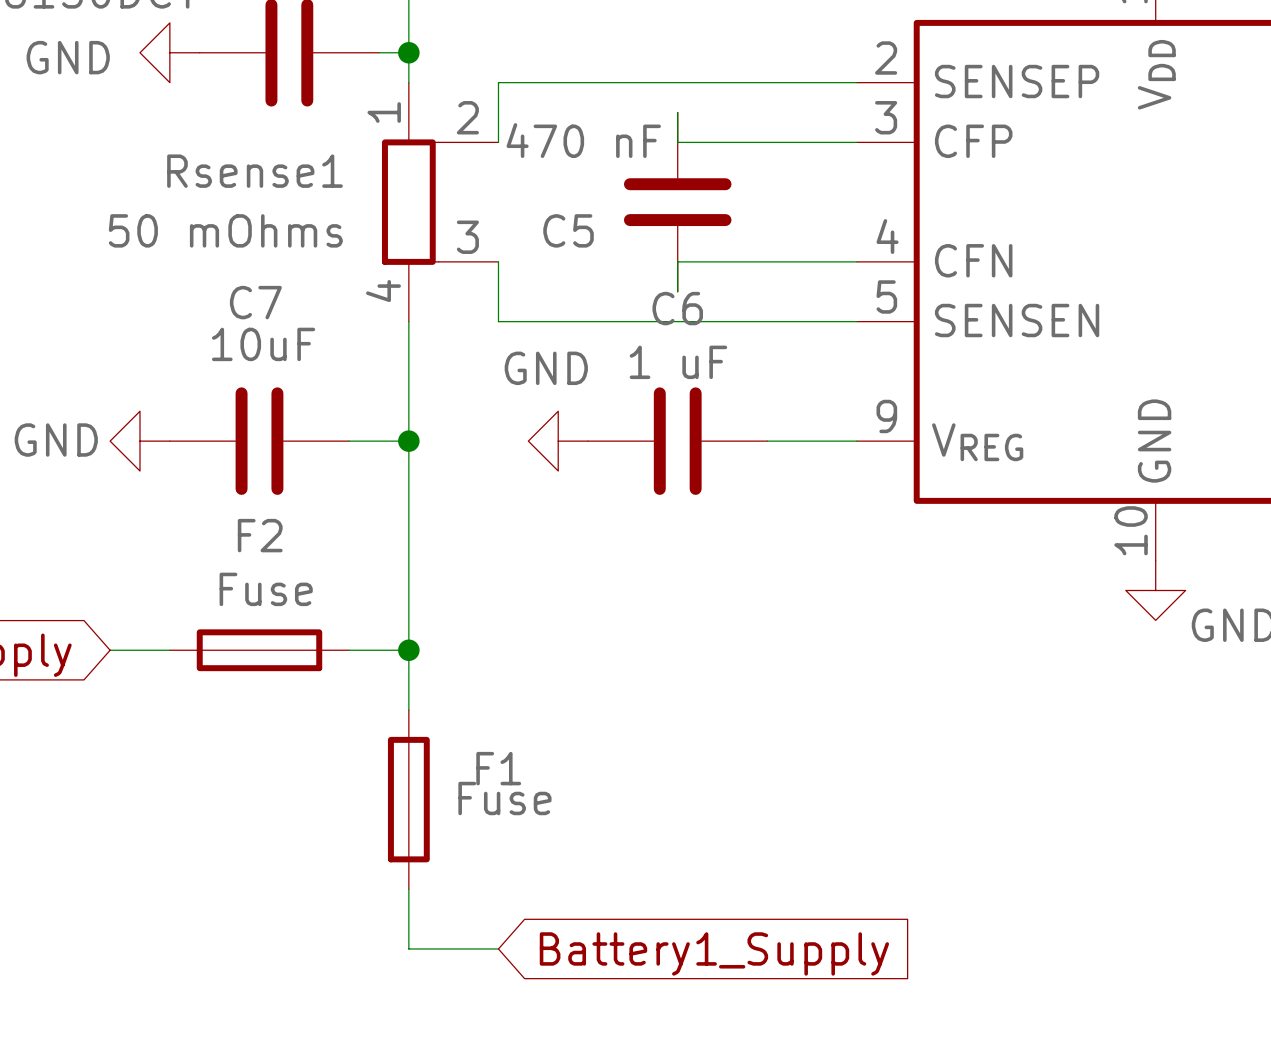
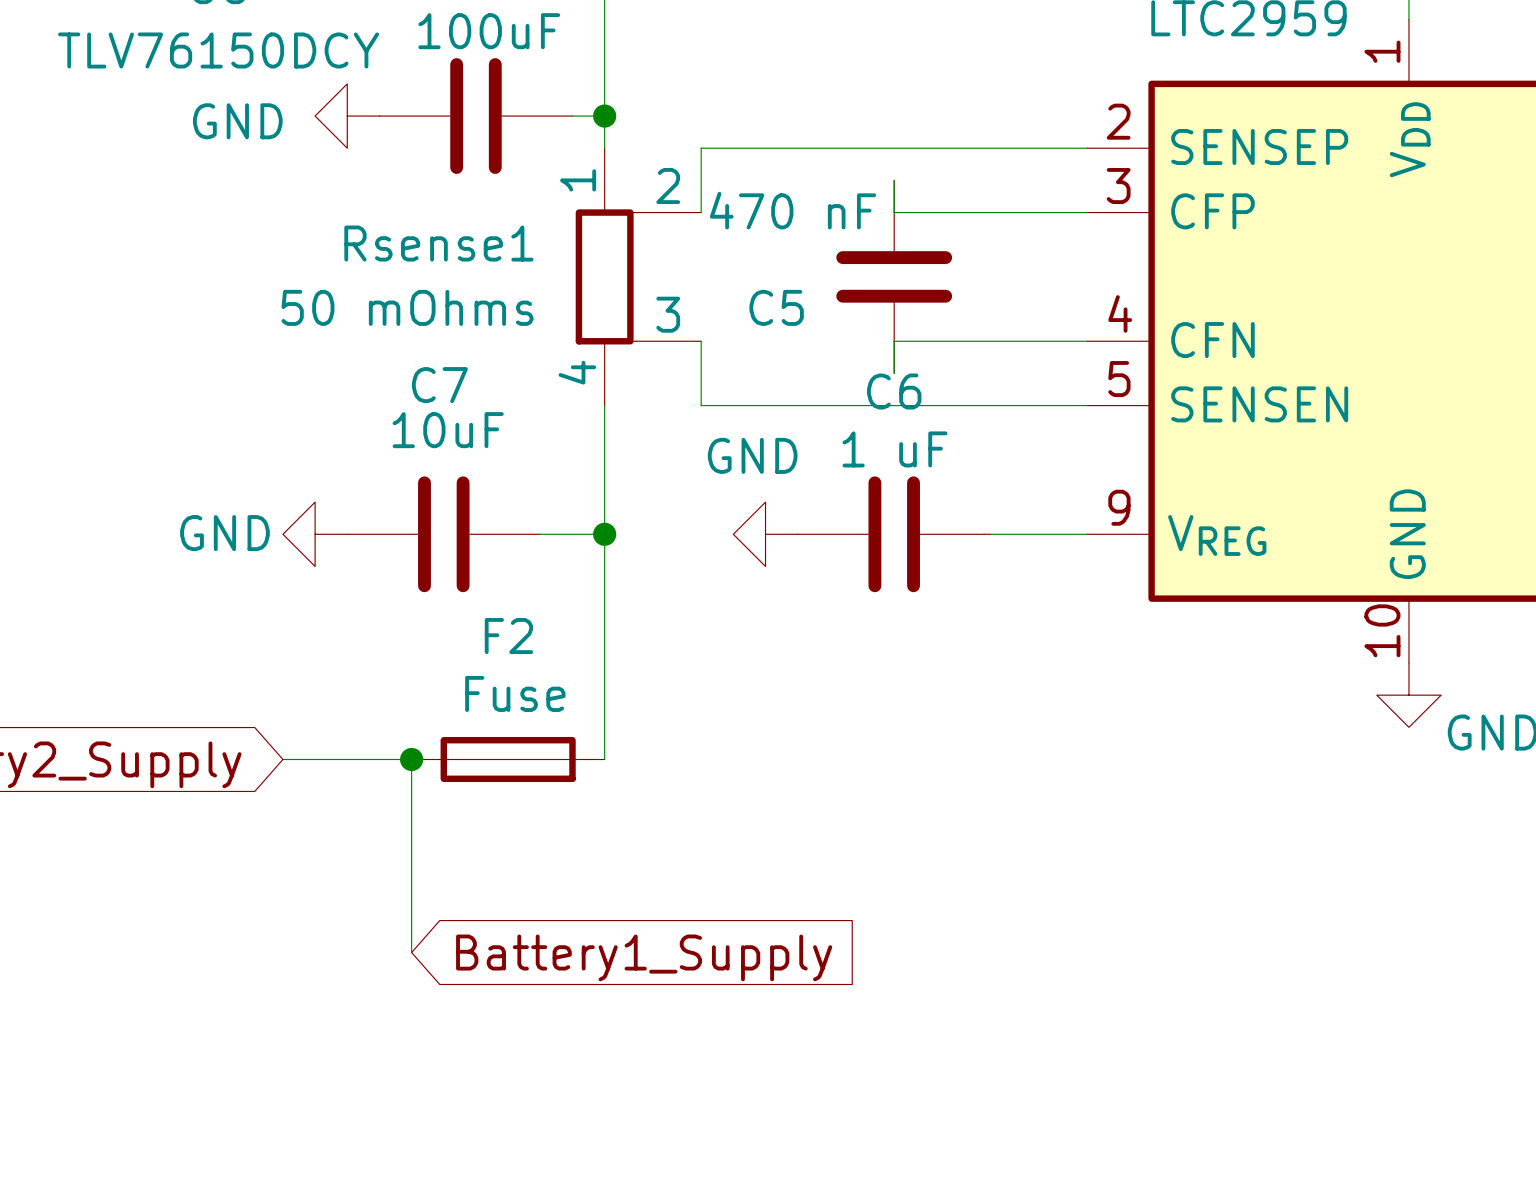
wire: none -> (347, 759) (411, 759) (411, 952)
junction: none -> (411, 759)
F2 position: (259, 650) -> (508, 759)
wire: (349, 650) (408, 650) (408, 709) -> none
junction: (408, 650) -> none
F1: Fuse (408, 799) -> none
wire: (408, 889) (408, 948) (498, 948) -> none
global label position: Battery1_Supply (714, 953) -> Battery1_Supply (644, 957)

